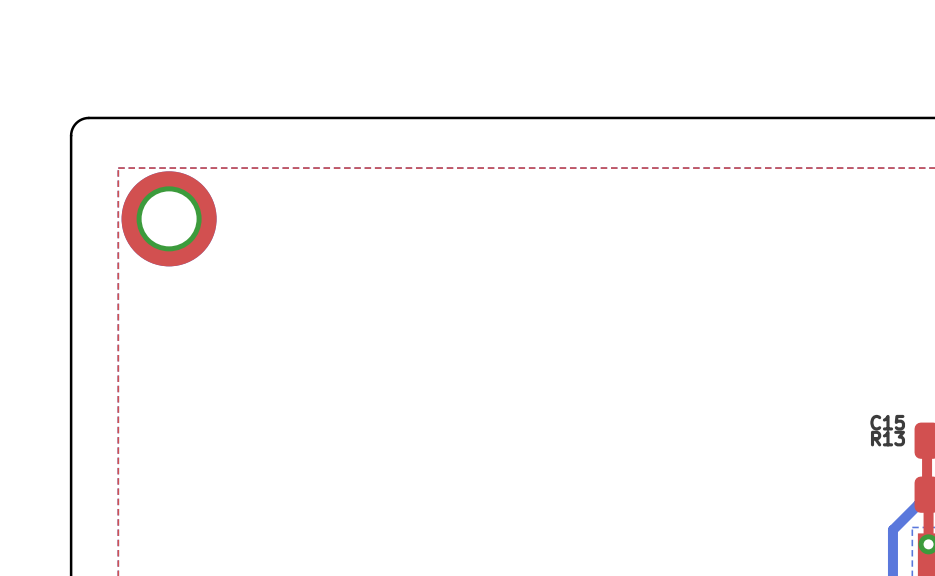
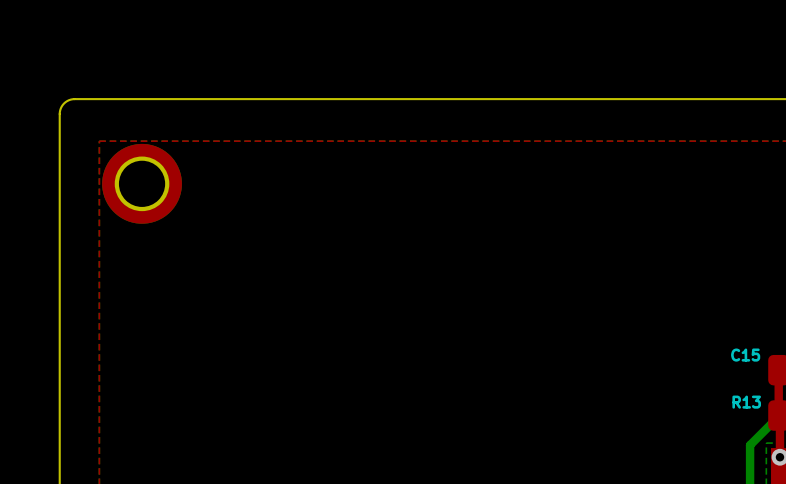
R13 name position: R13 (887, 438) -> R13 (746, 402)

